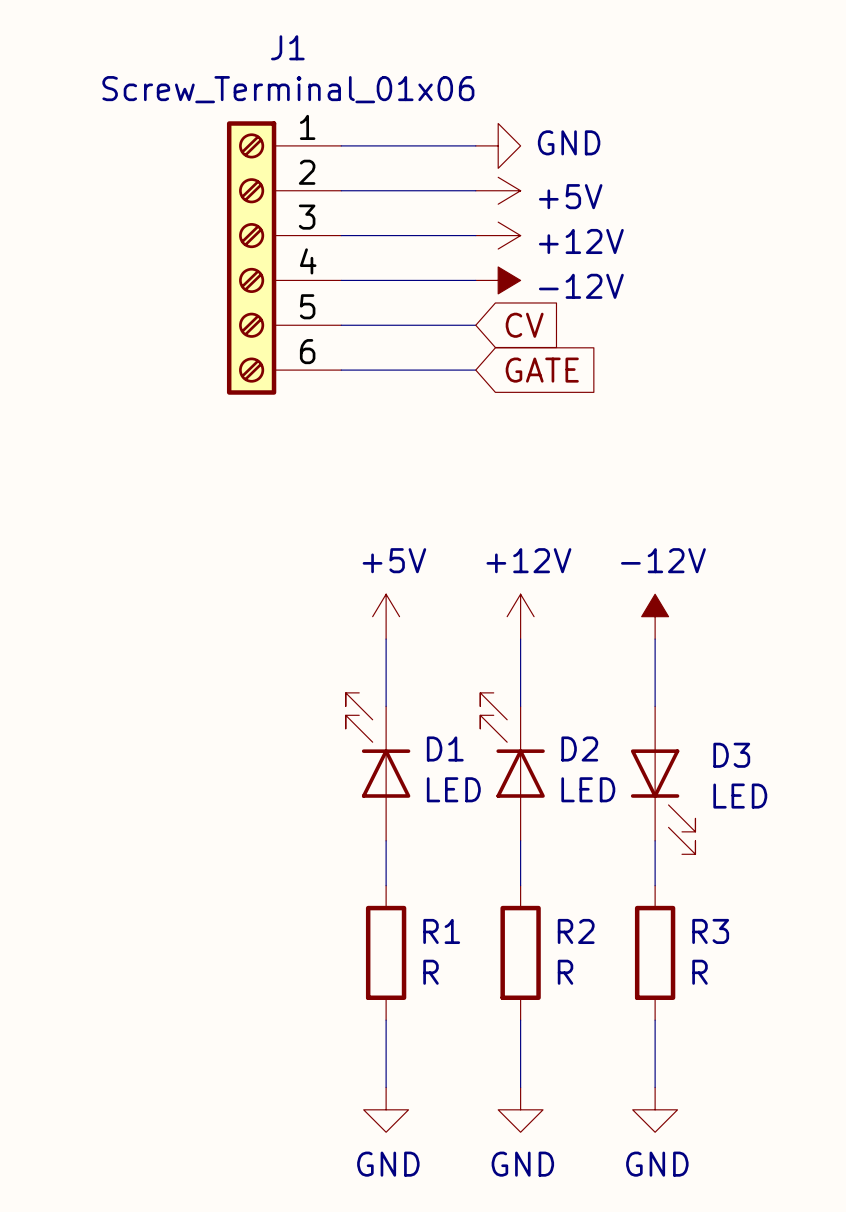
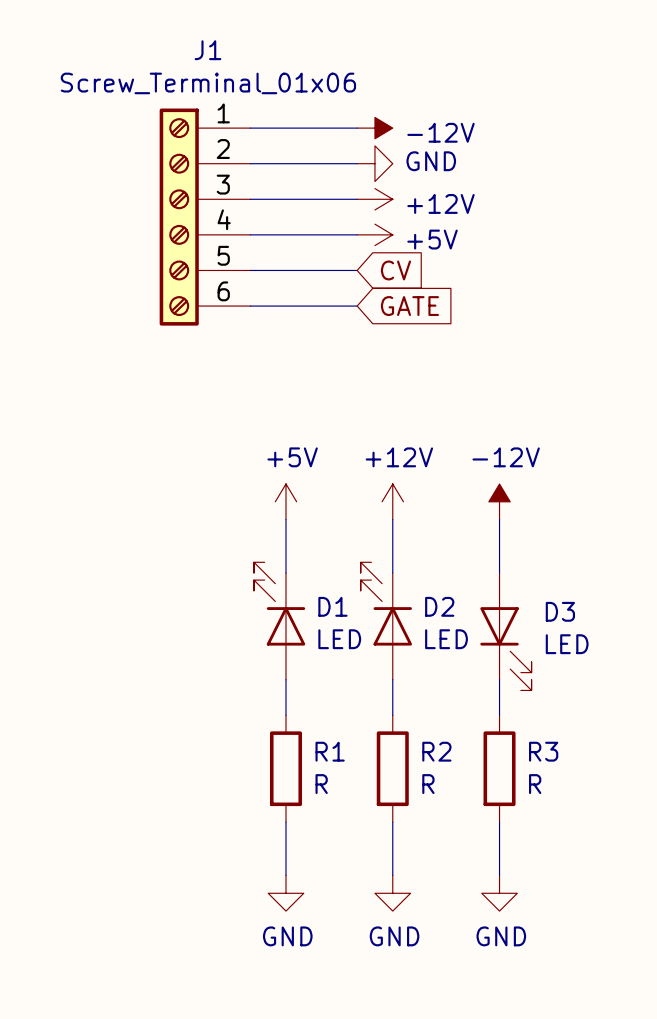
power symbol: GND (498, 145) -> -12V (374, 128)
power symbol: +5V (498, 190) -> GND (374, 163)
power symbol: -12V (498, 280) -> +5V (374, 234)

